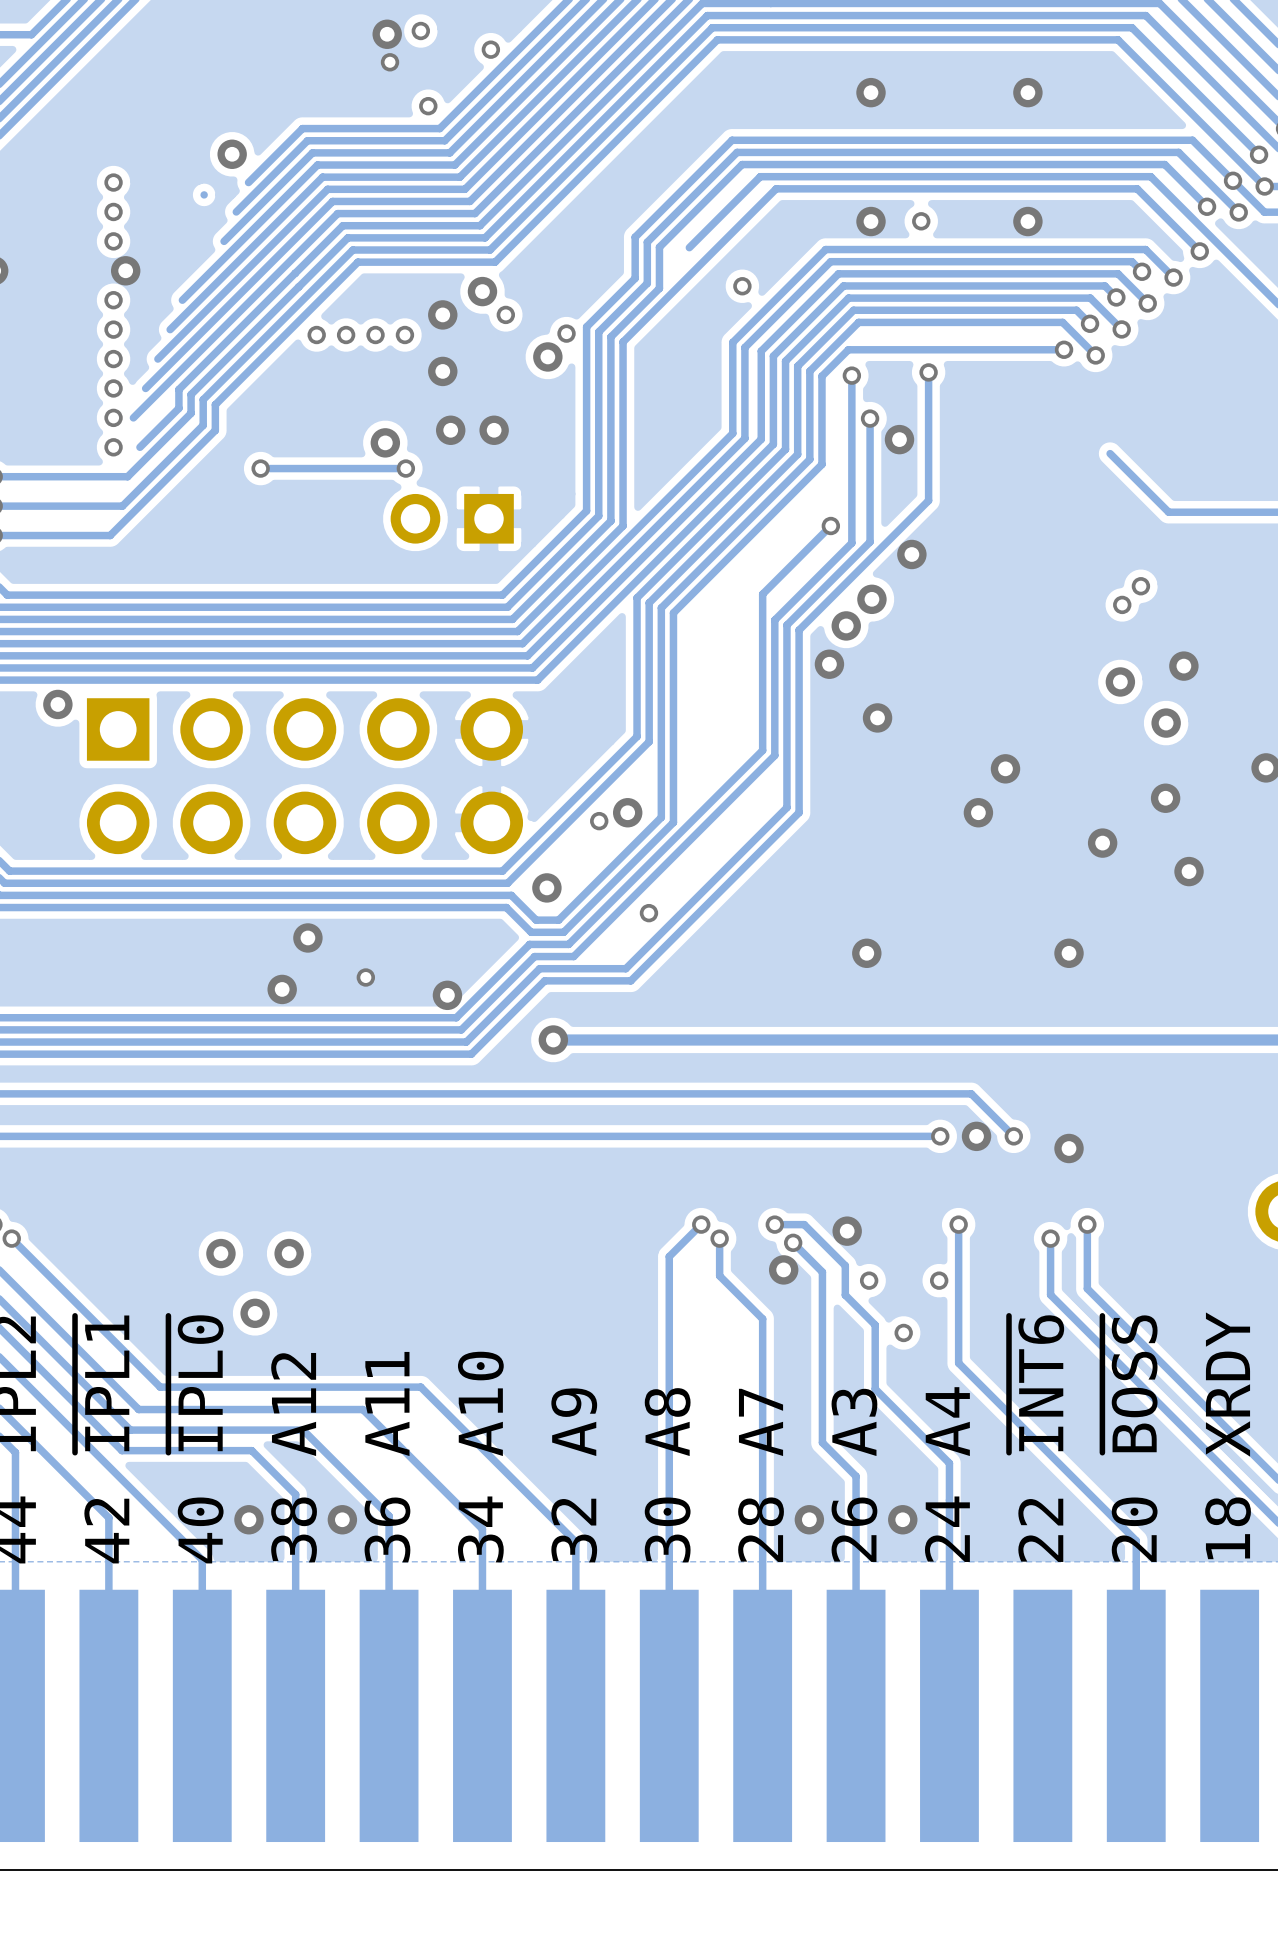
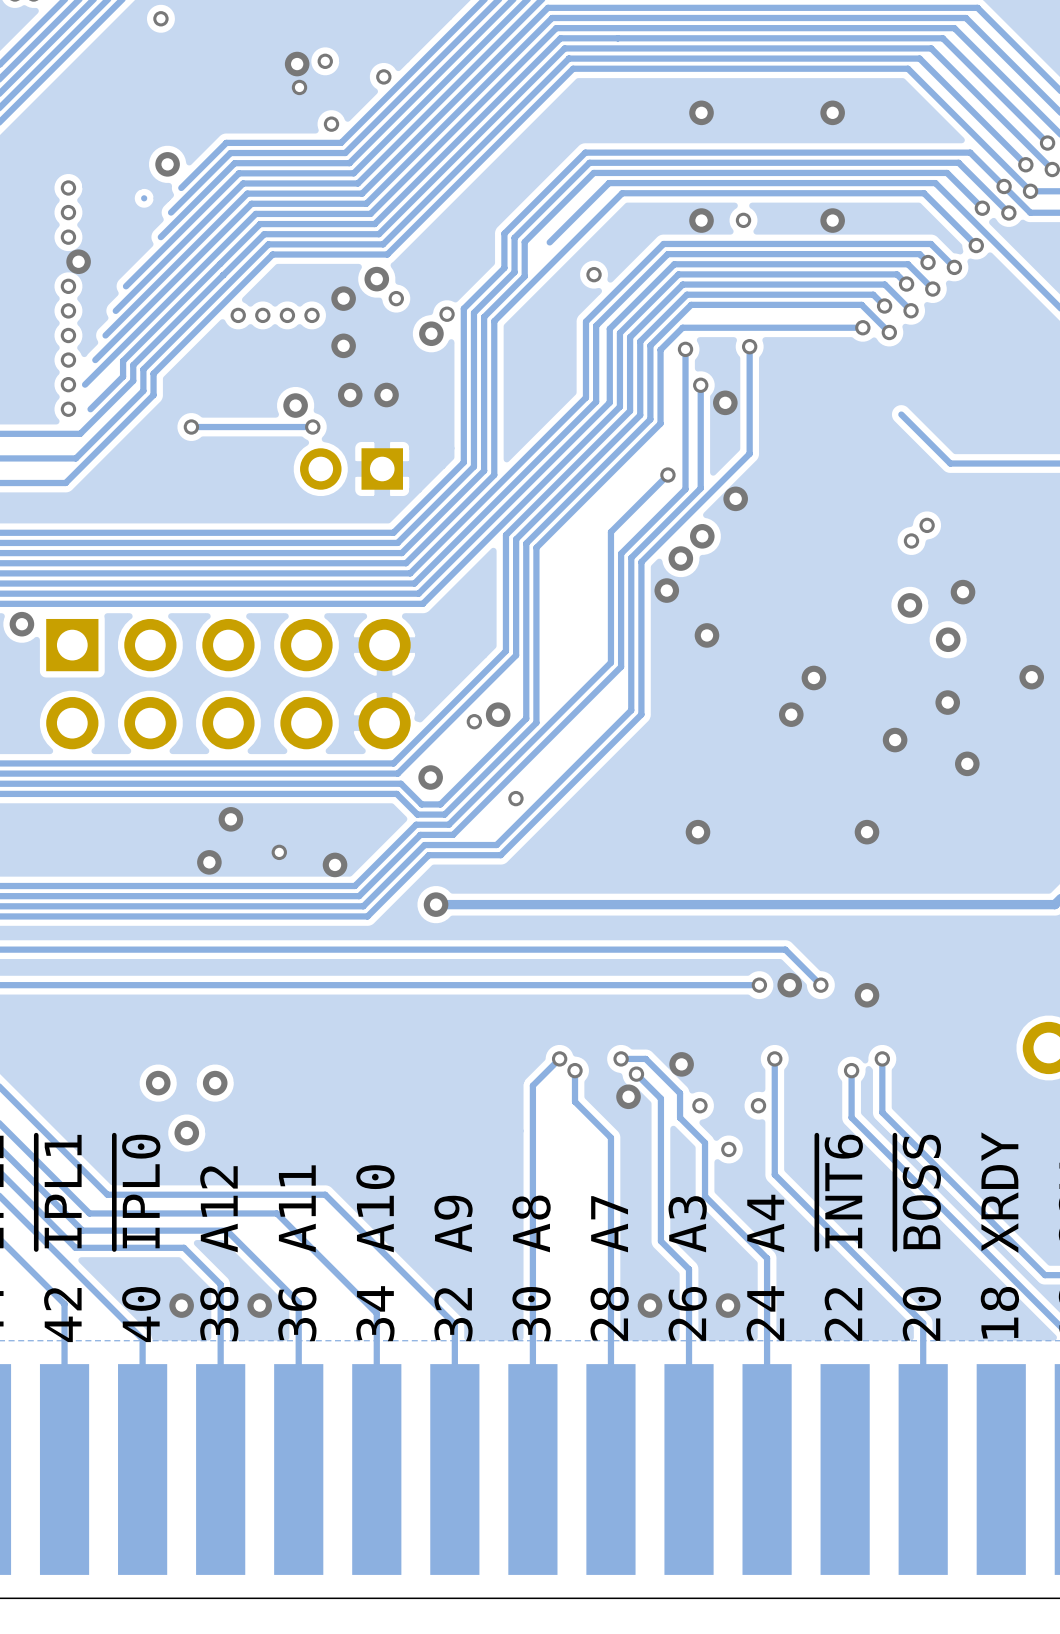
via position: (447, 995) -> (335, 864)

